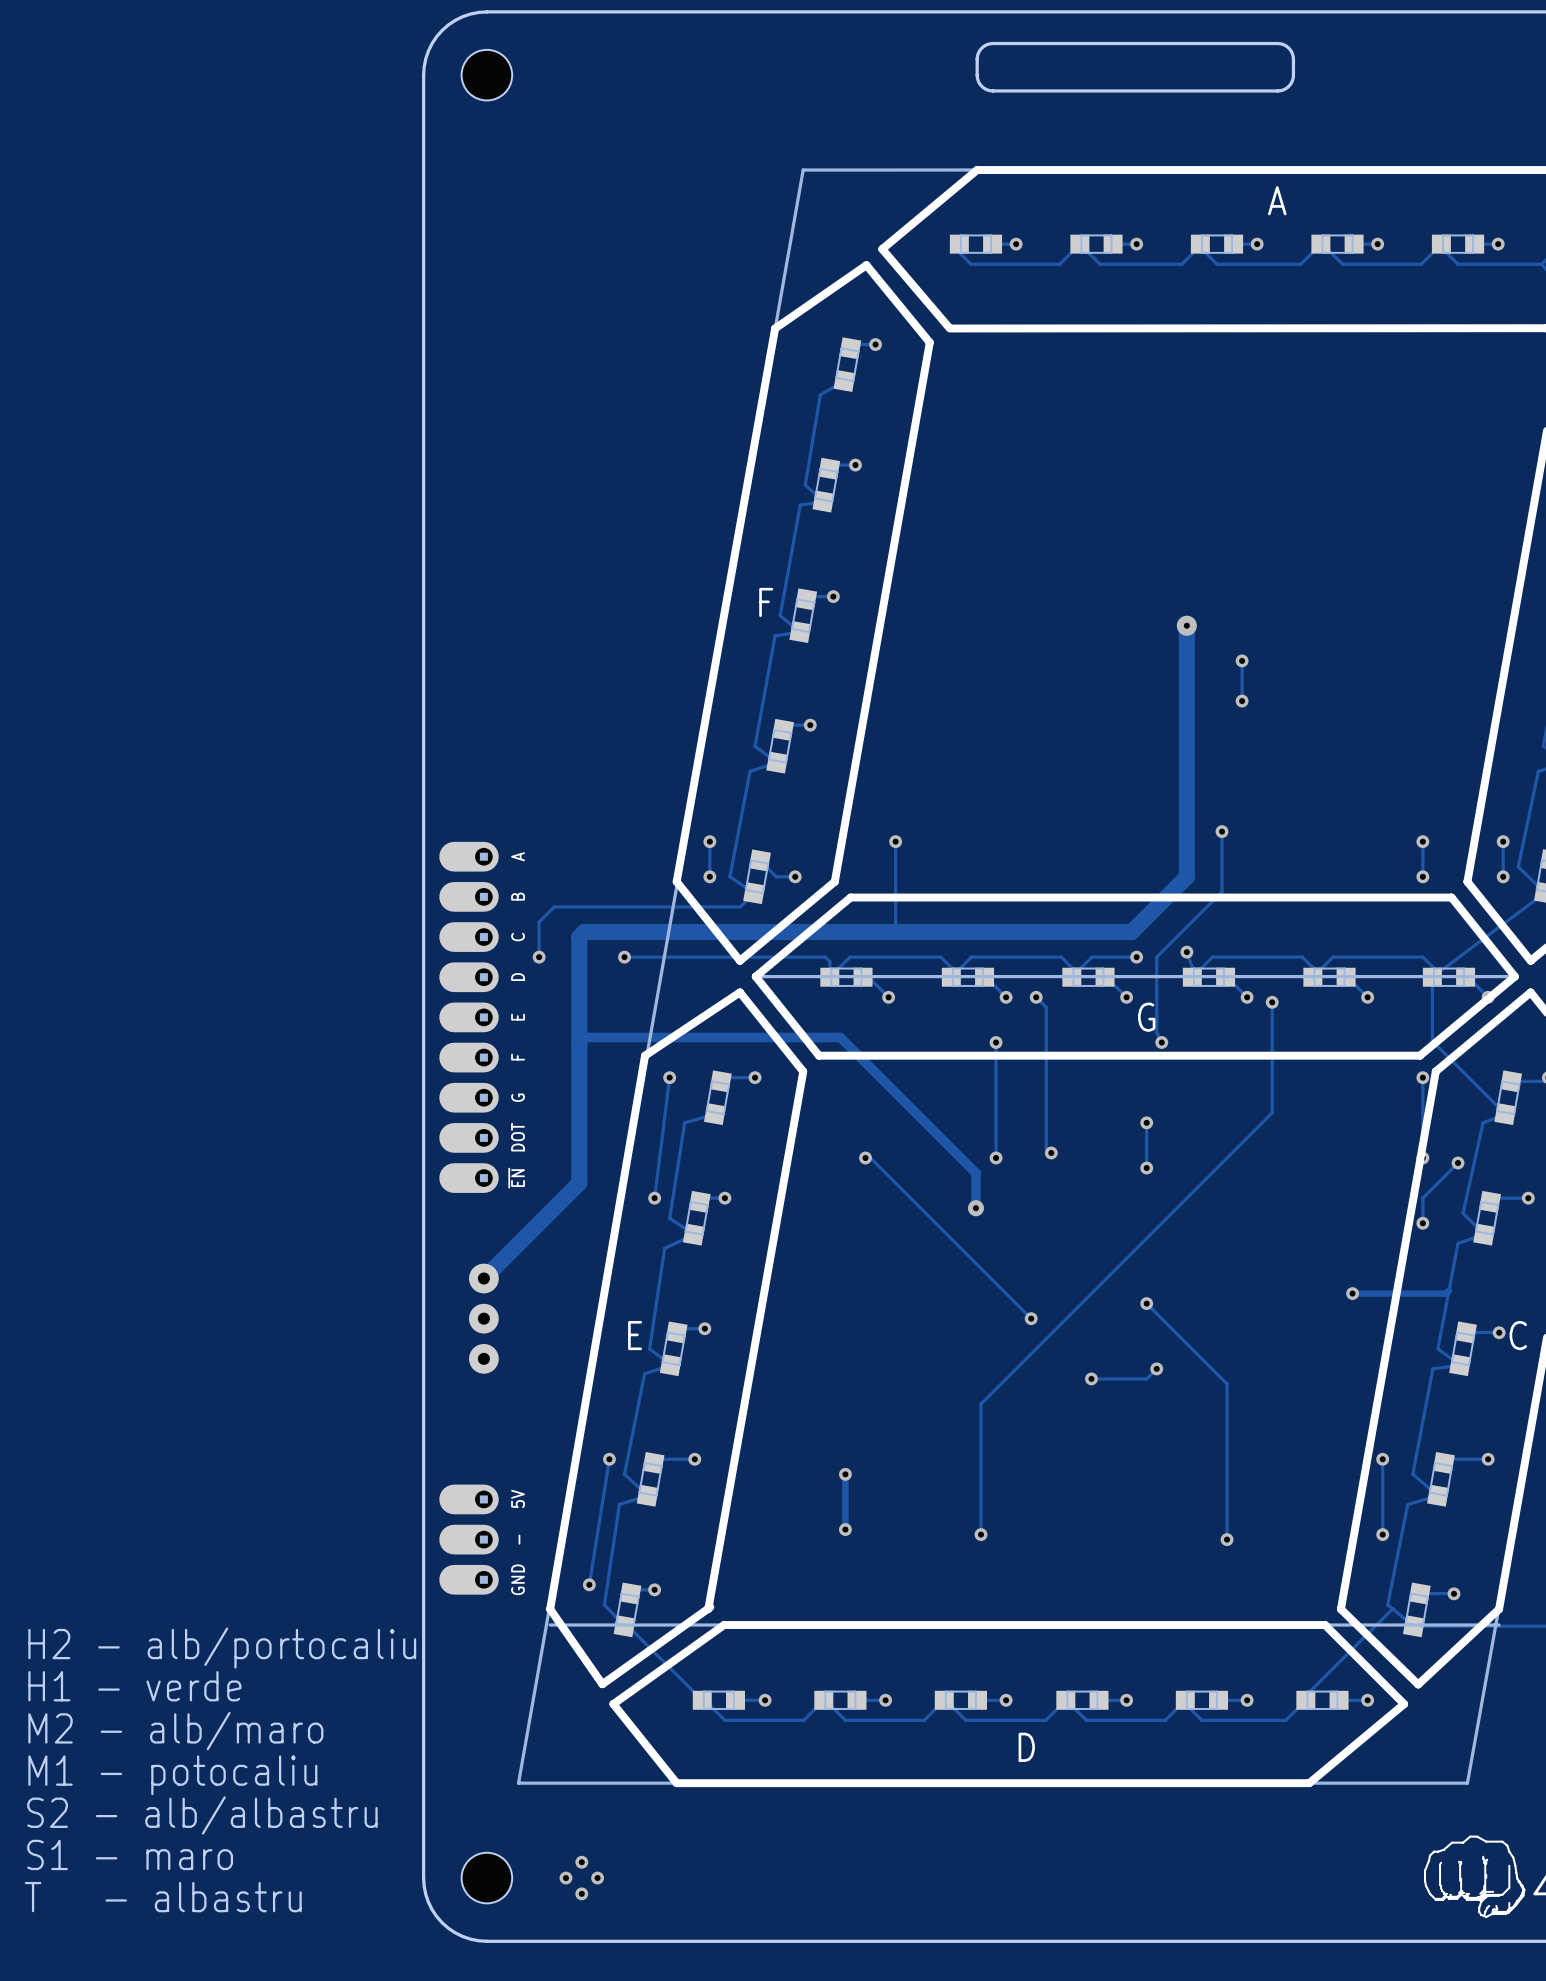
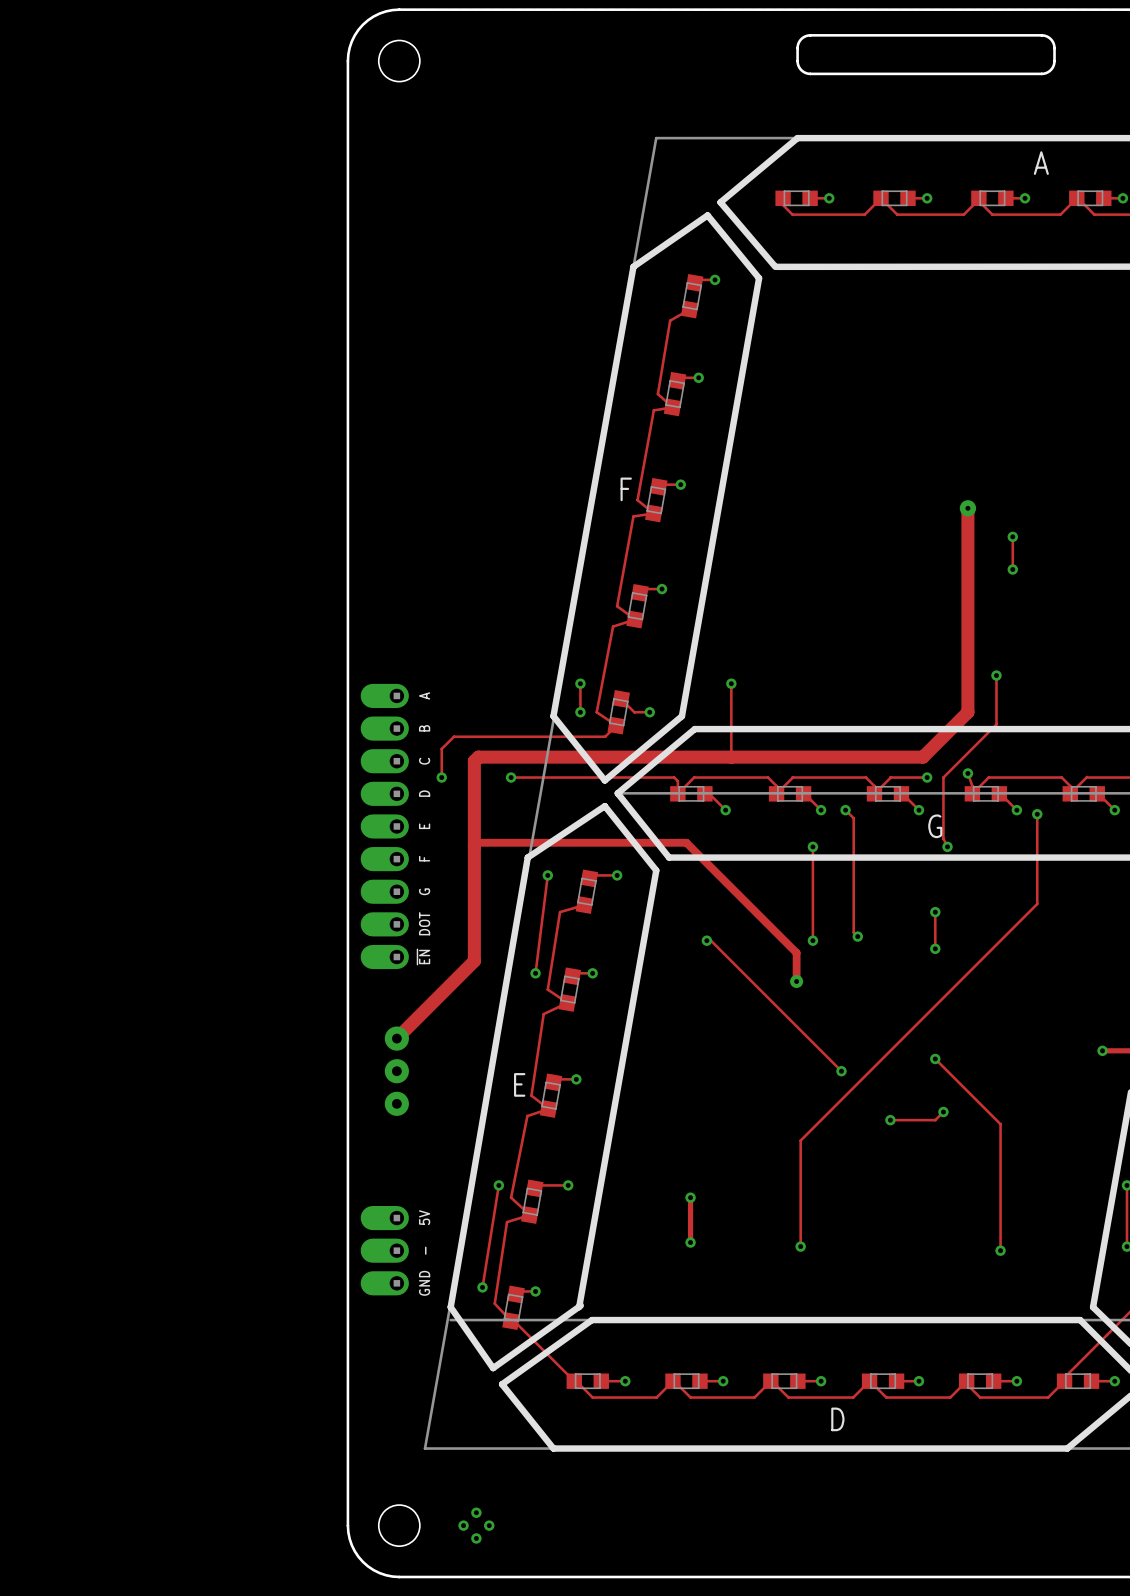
text: H2 - alb/portocaliu (222, 1648) -> none
text: H1 - verde (134, 1686) -> none
text: M2 - alb/maro (175, 1731) -> none
text: M1 - potocaliu (172, 1775) -> none
text: S2 - alb/albastru (202, 1815) -> none
text: S1 - maro (130, 1854) -> none
text: T - albastru (163, 1897) -> none

